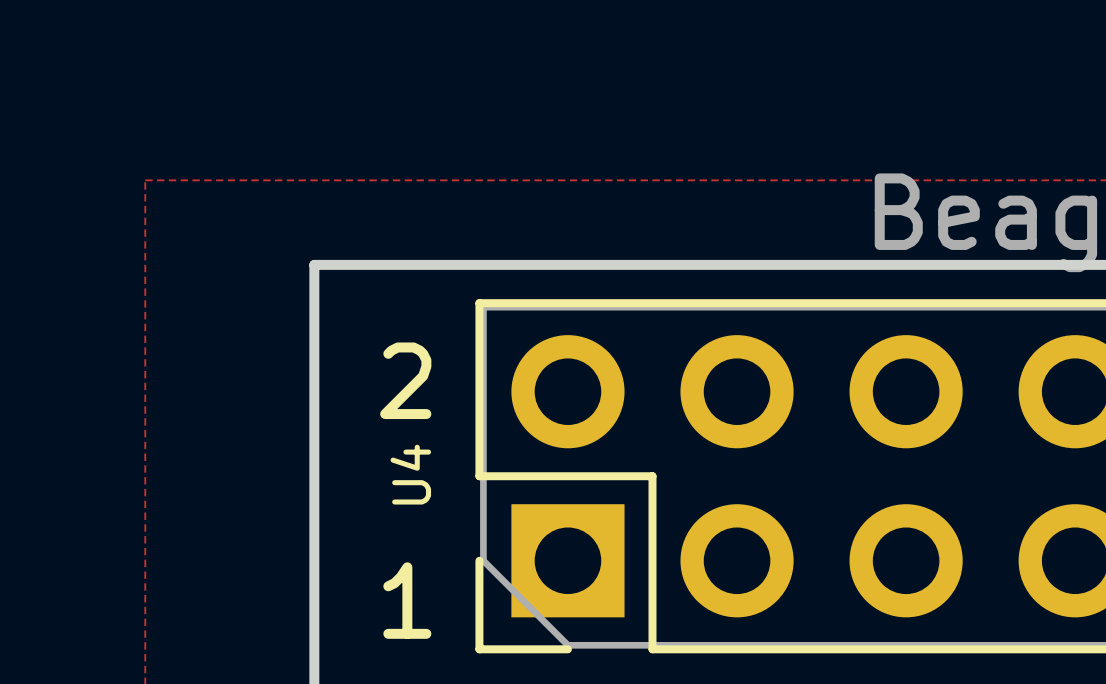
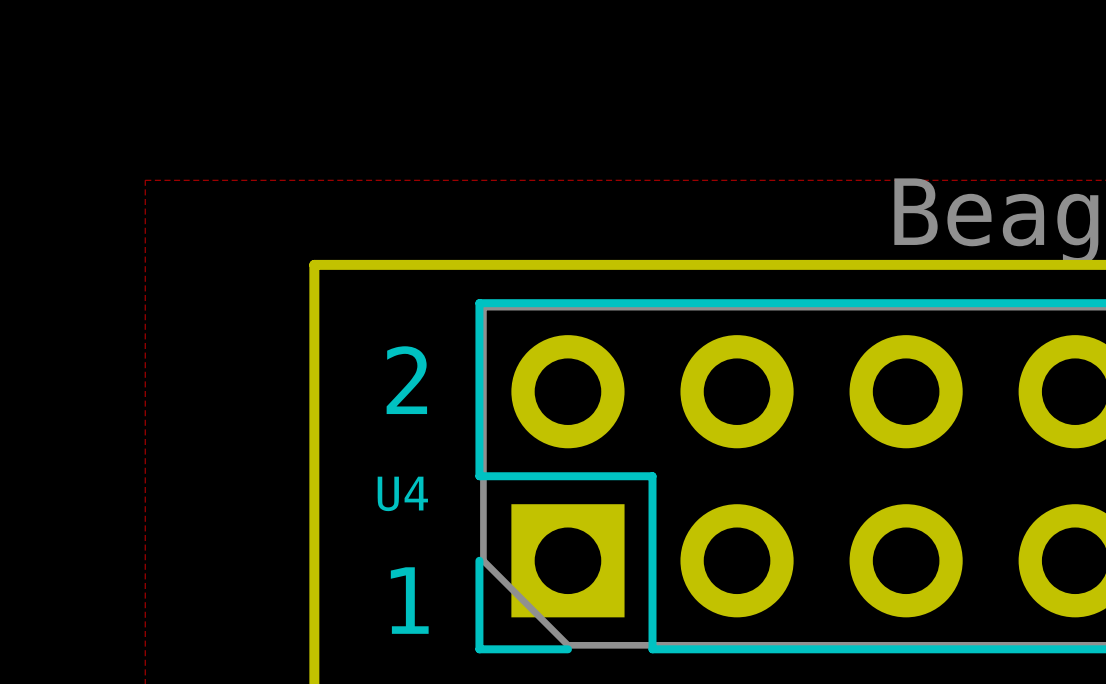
U4 name rotation: 0° (410, 474) -> 90° clockwise (402, 493)

